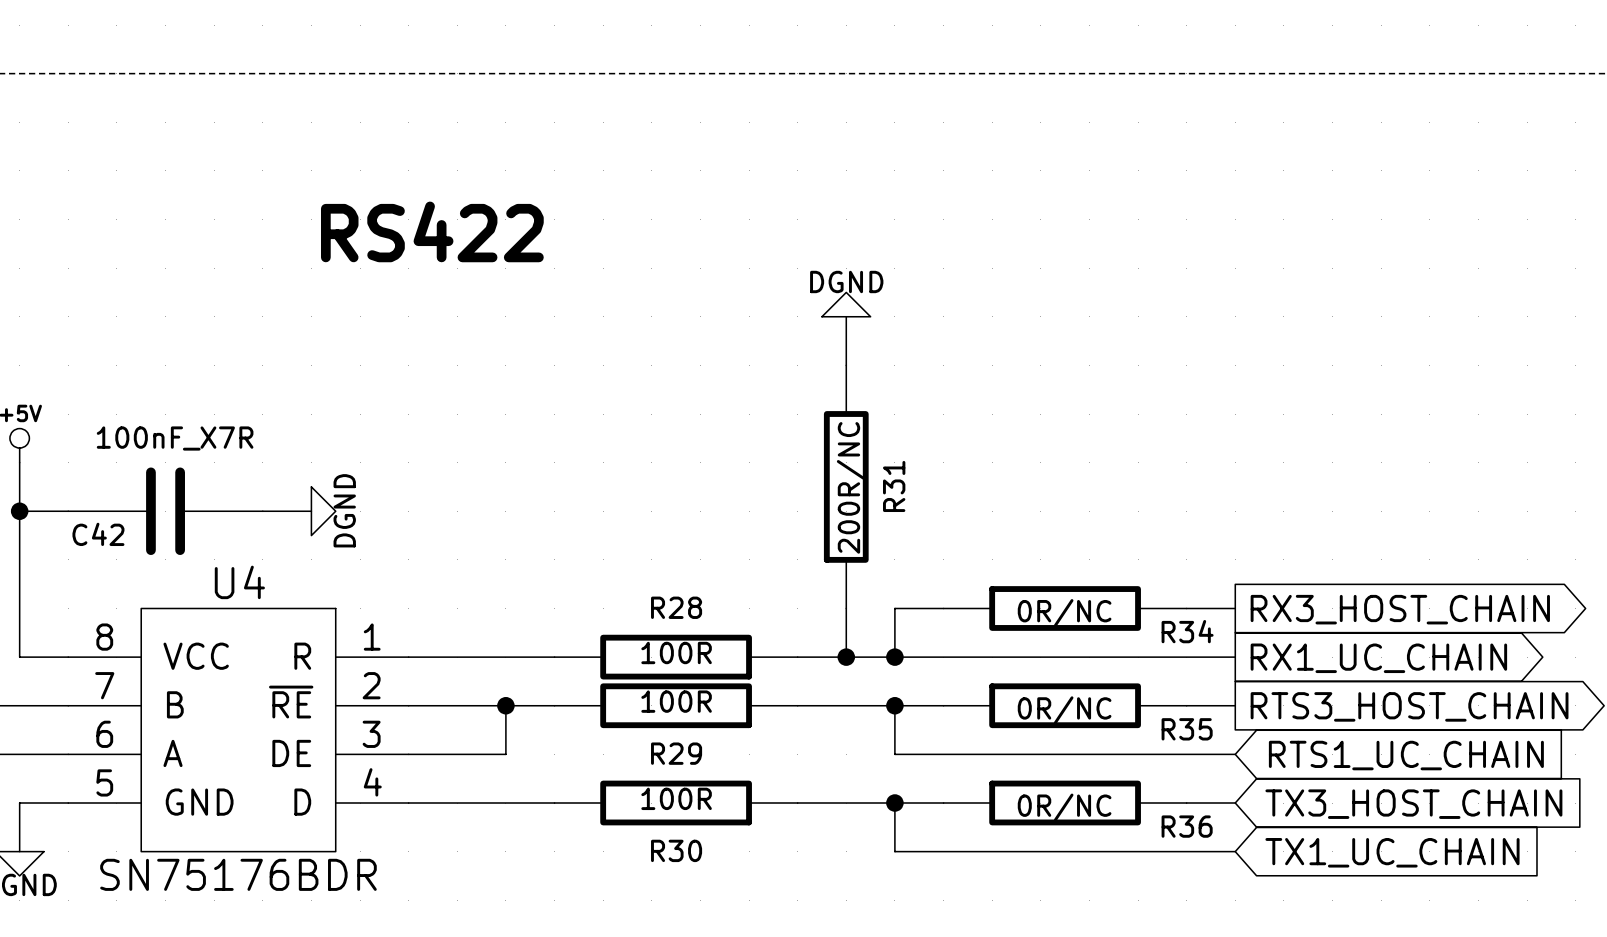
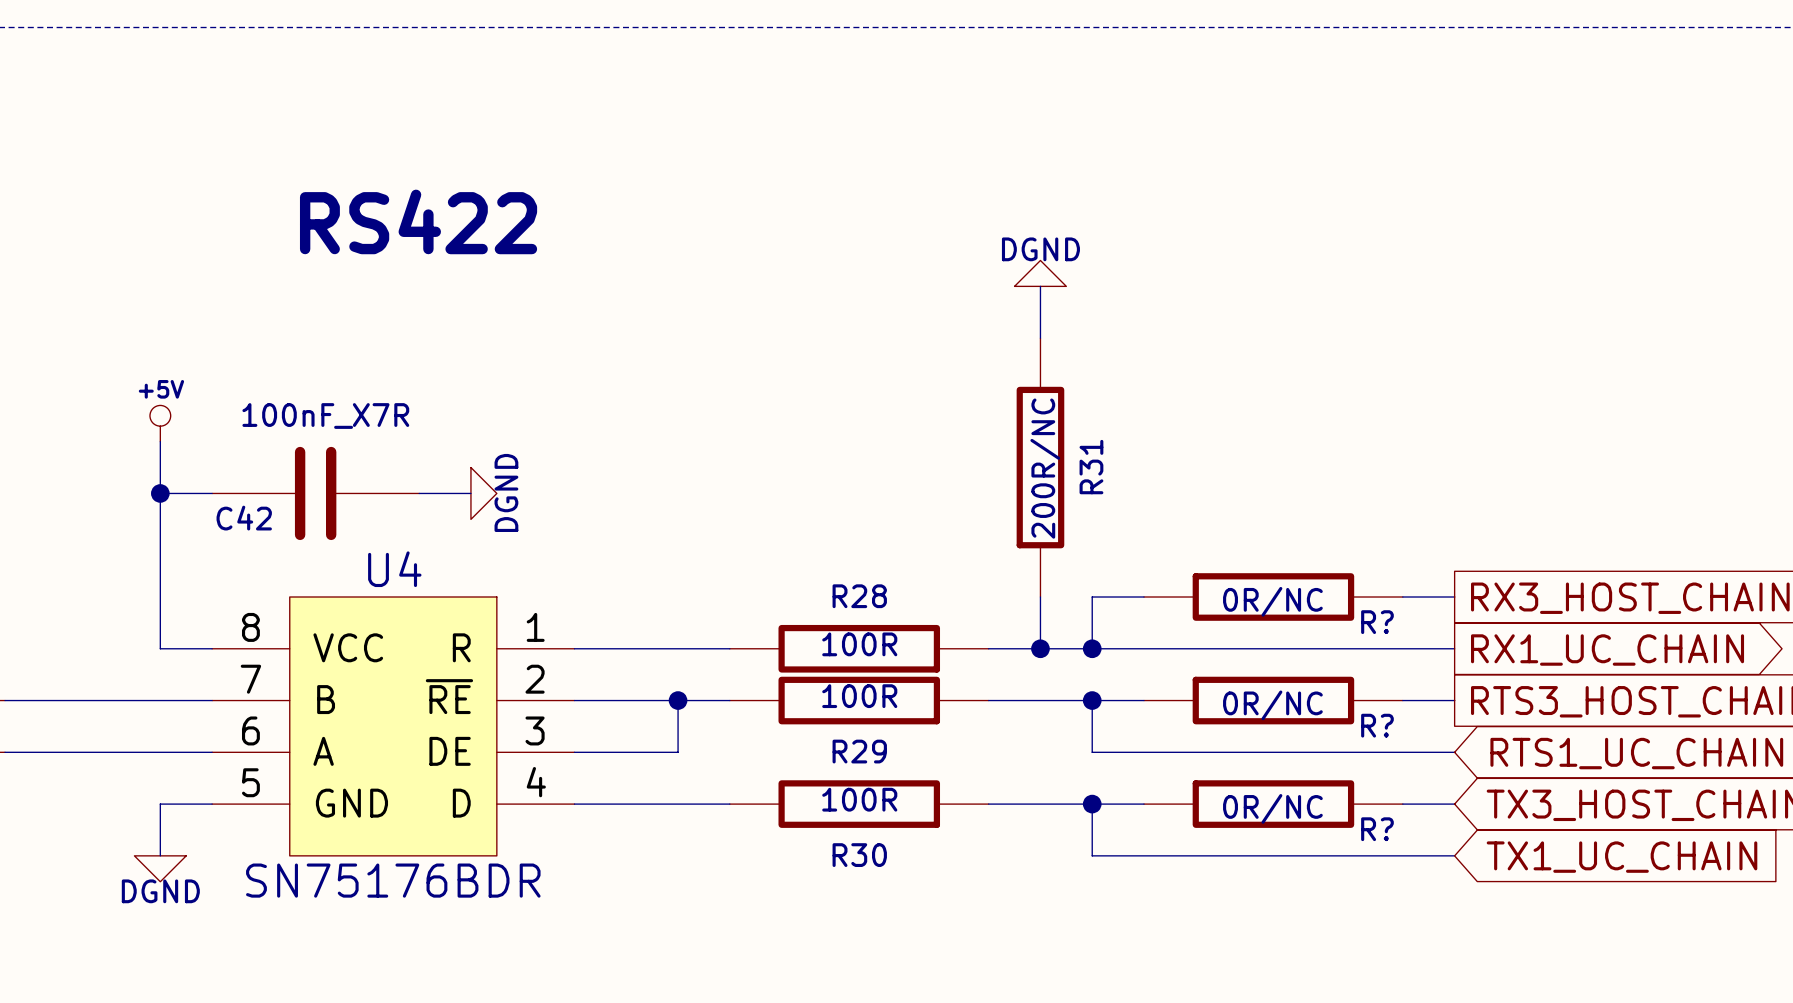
text position: RS422 (432, 231) -> RS422 (418, 221)
R34 name: R34 (1187, 631) -> R? (1377, 622)
R35 name: R35 (1187, 729) -> R? (1377, 725)
R36 name: R36 (1187, 826) -> R? (1377, 829)

